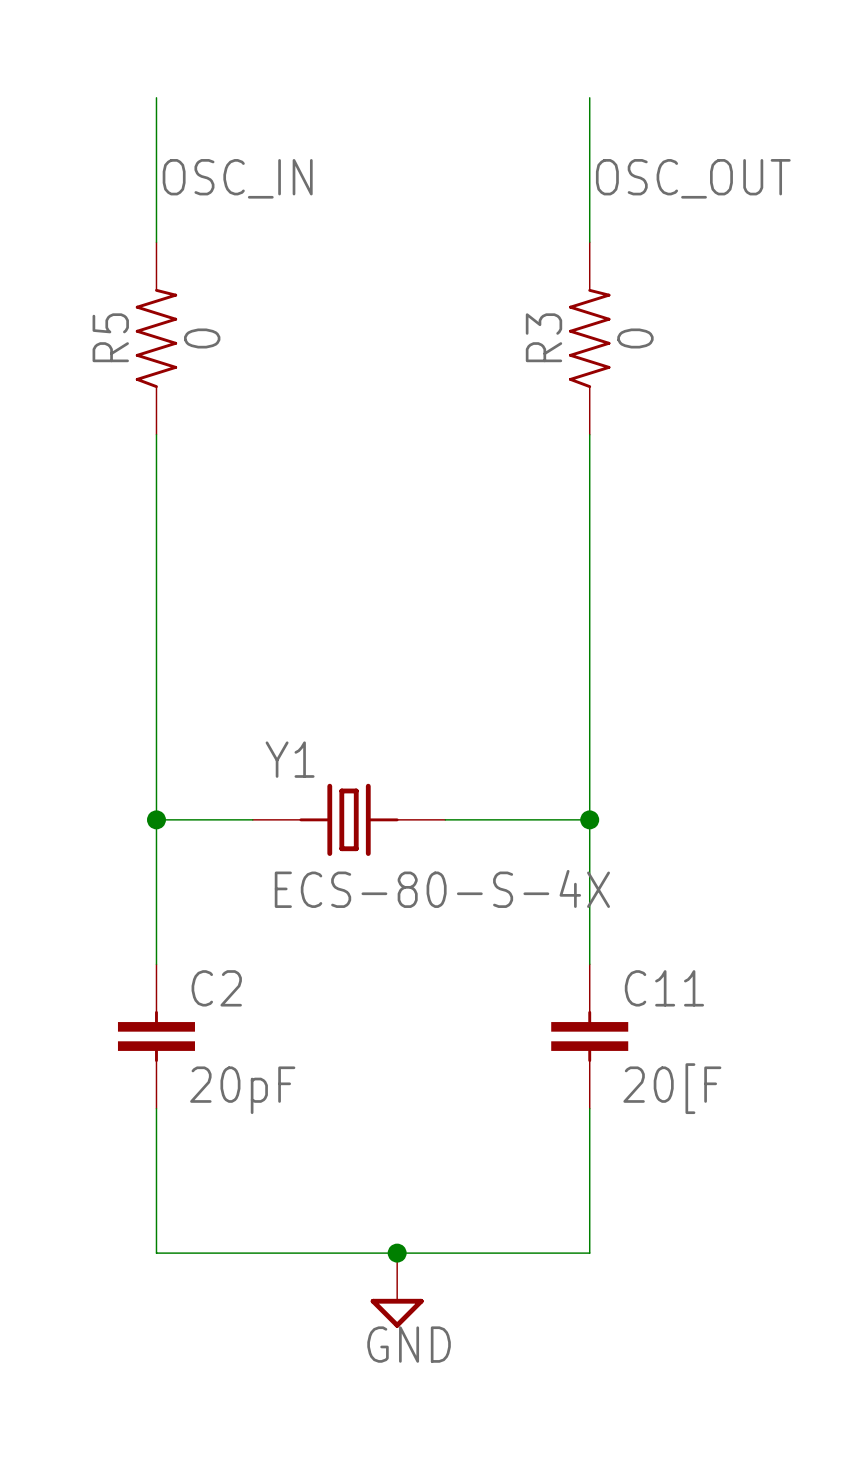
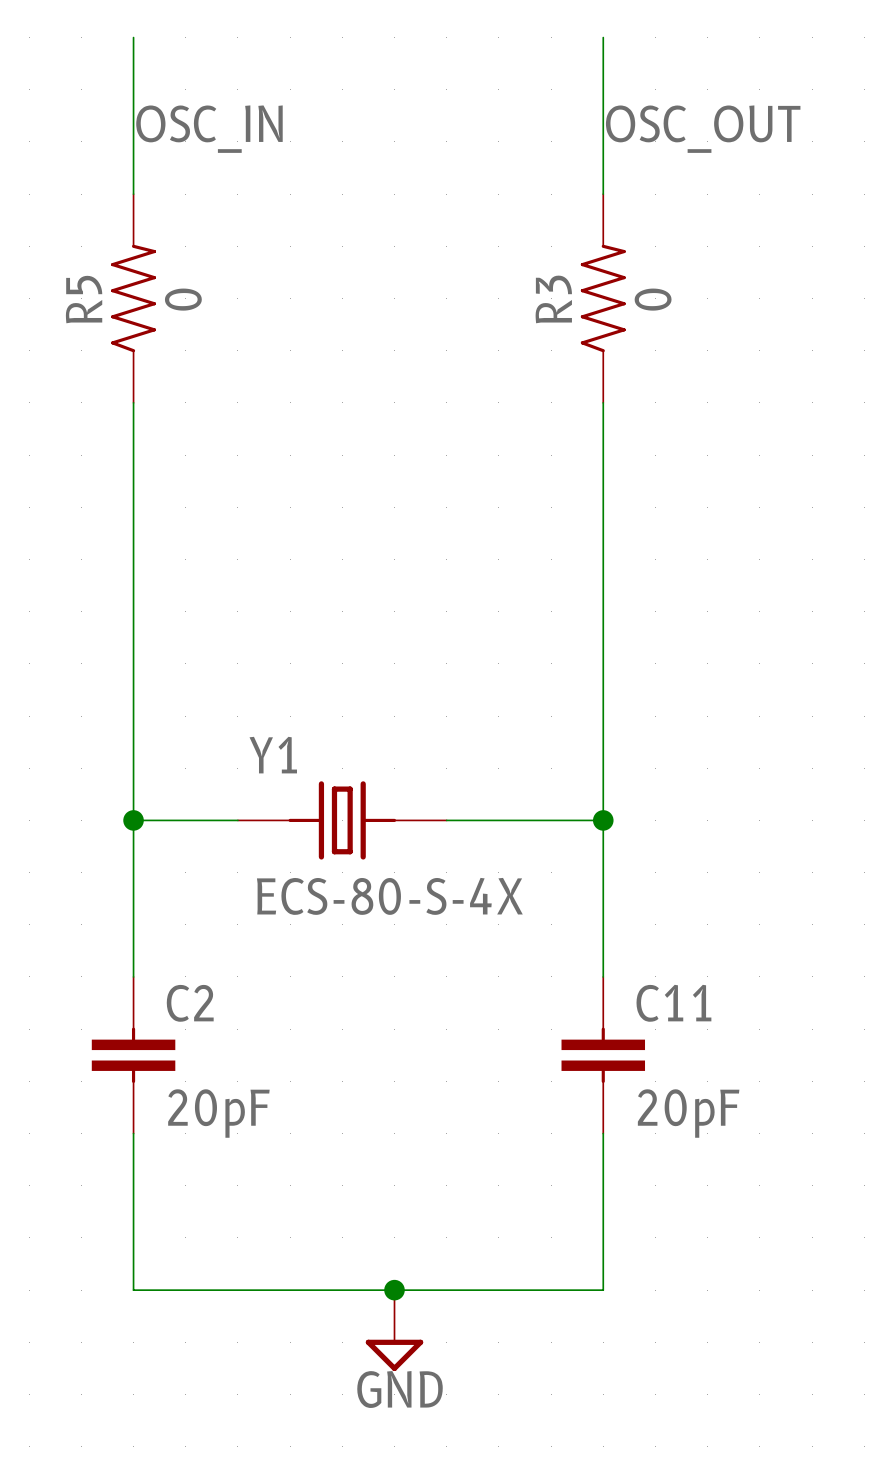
C11 value: 20[F (672, 1088) -> 20pF (688, 1113)

